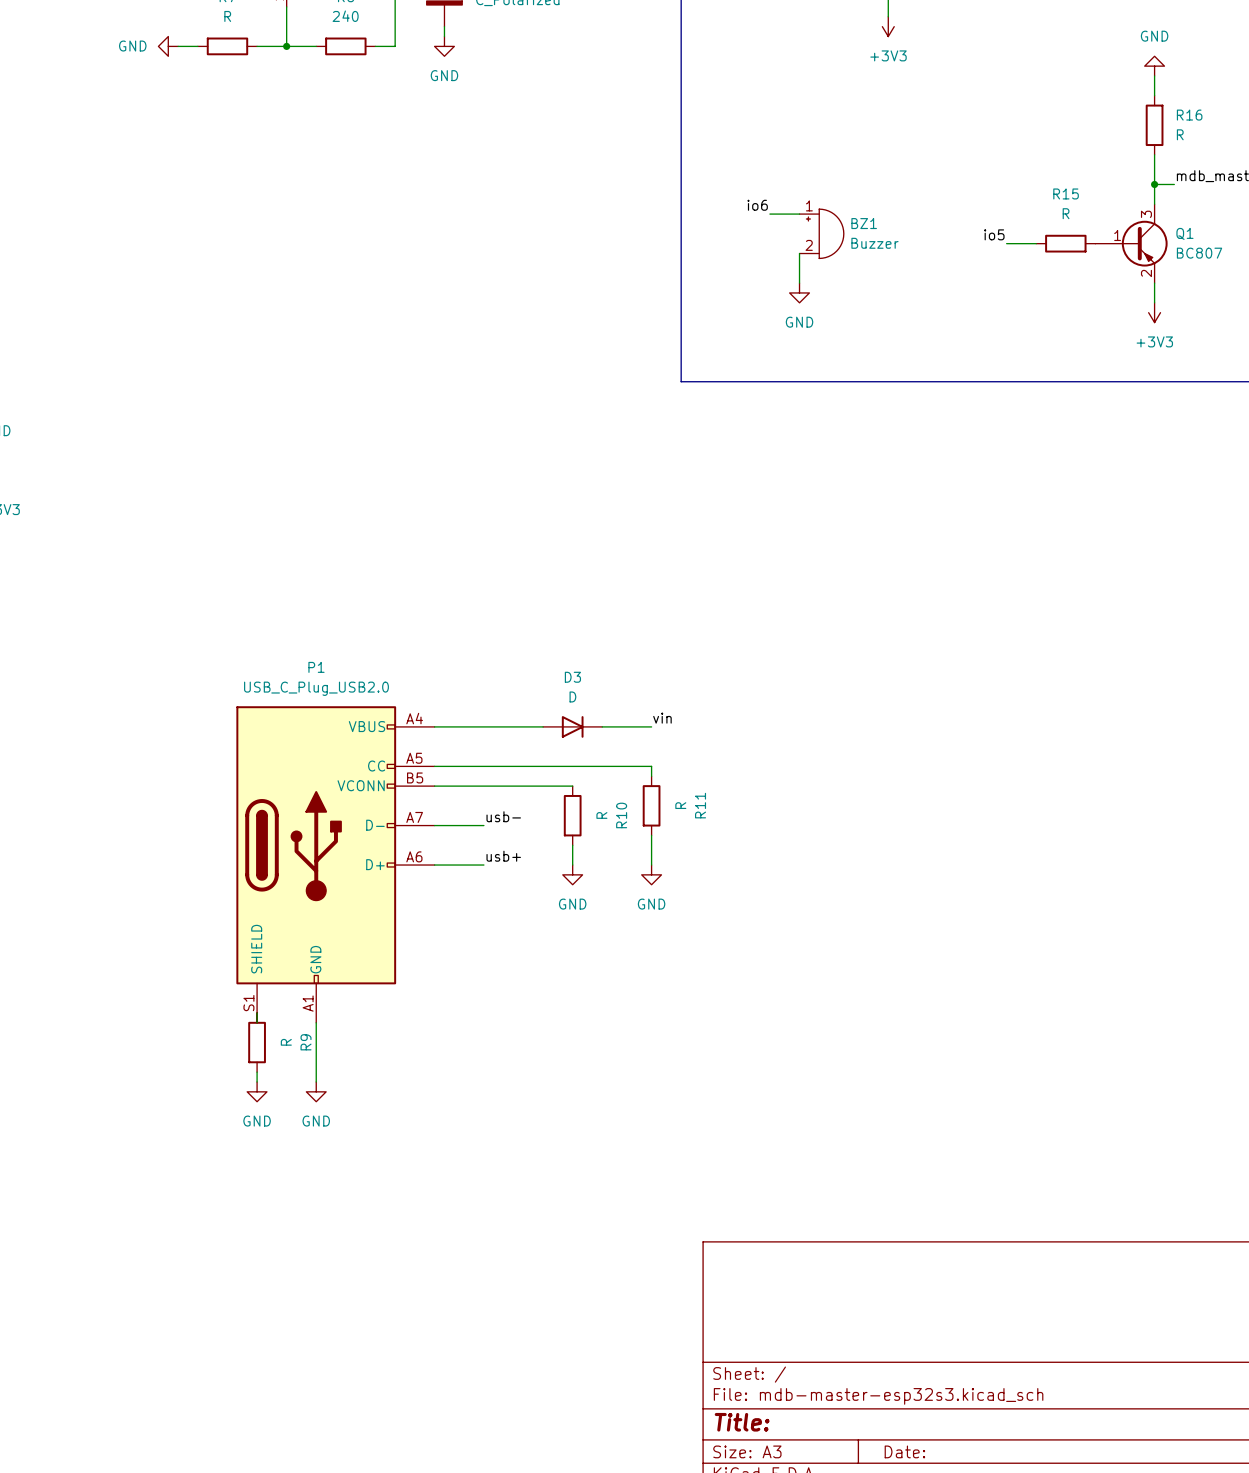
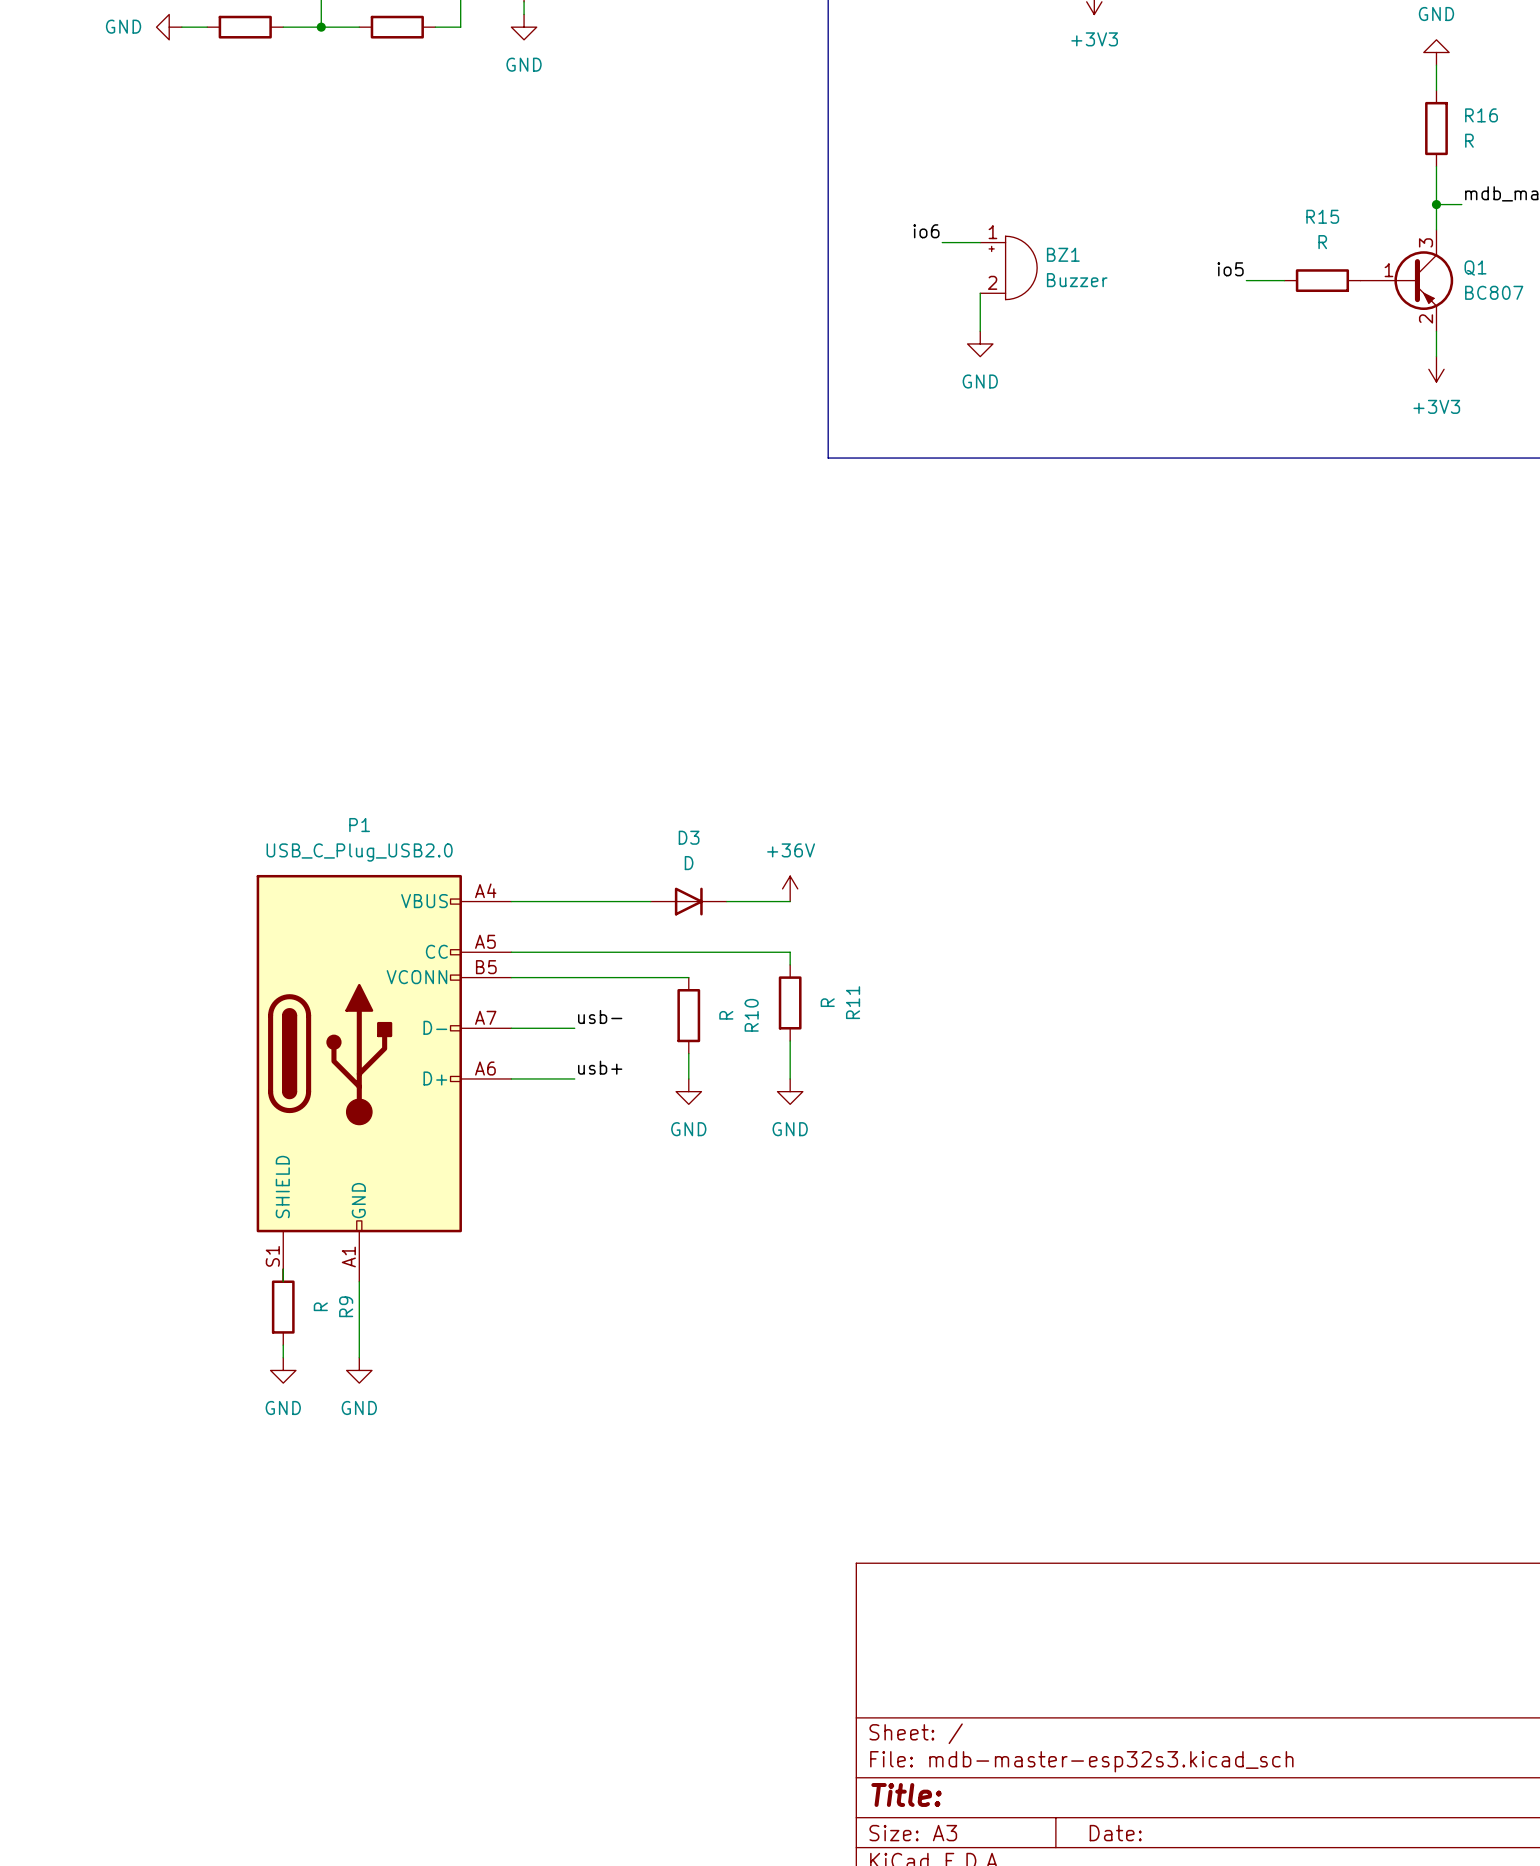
power symbol: none -> +36V (790, 888)
label: vin (662, 718) -> none

